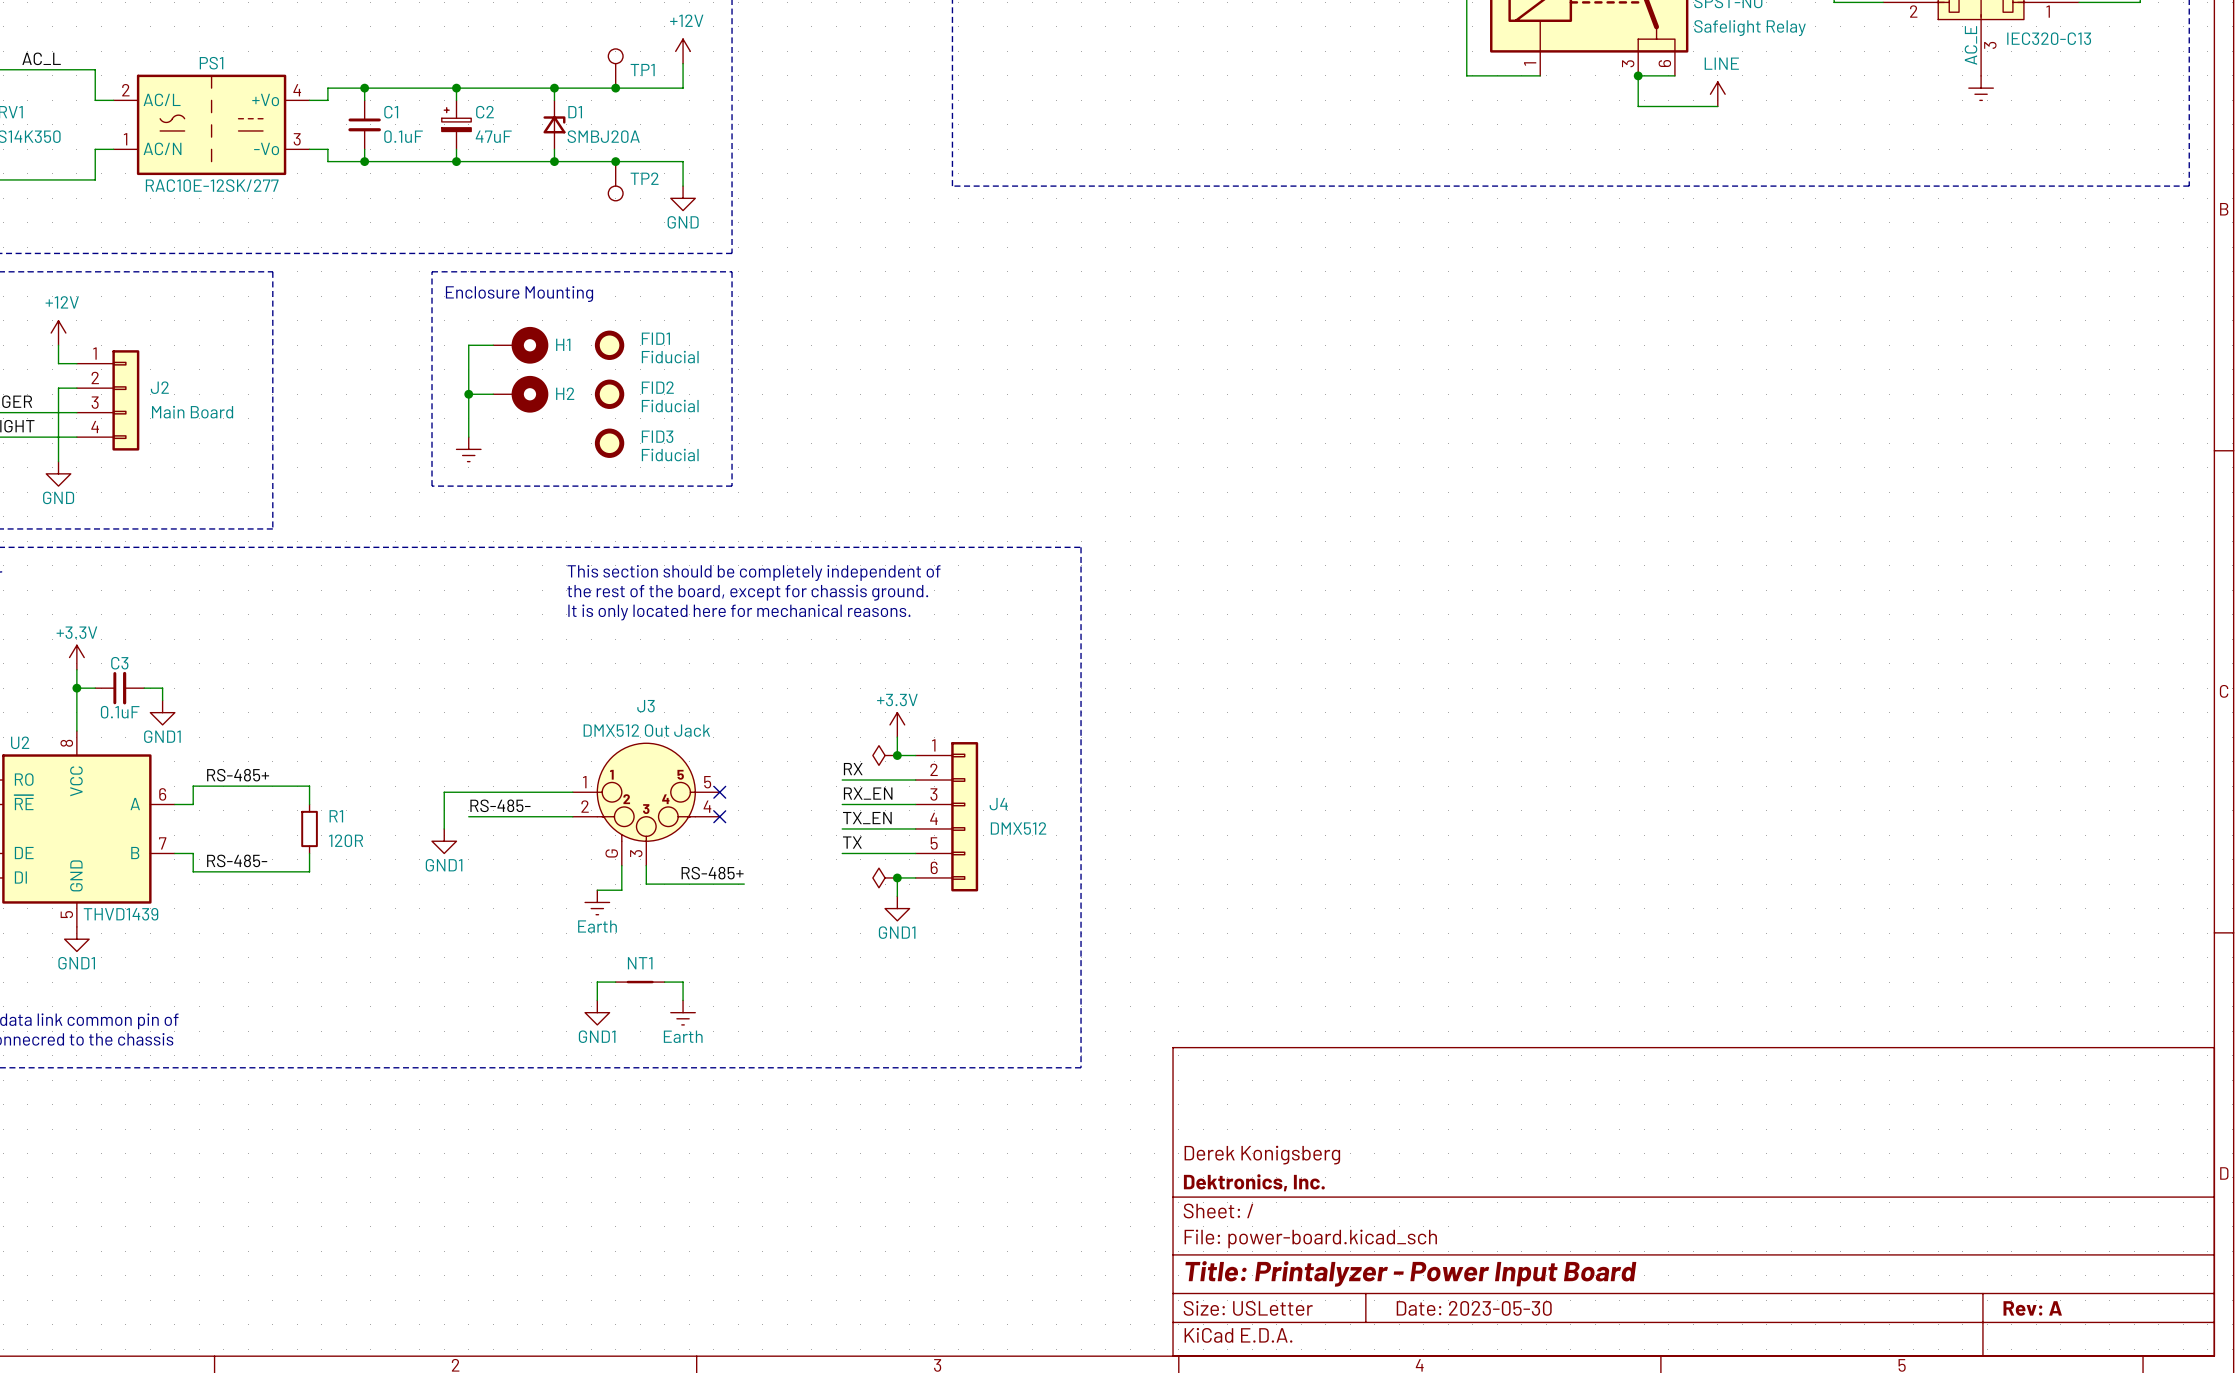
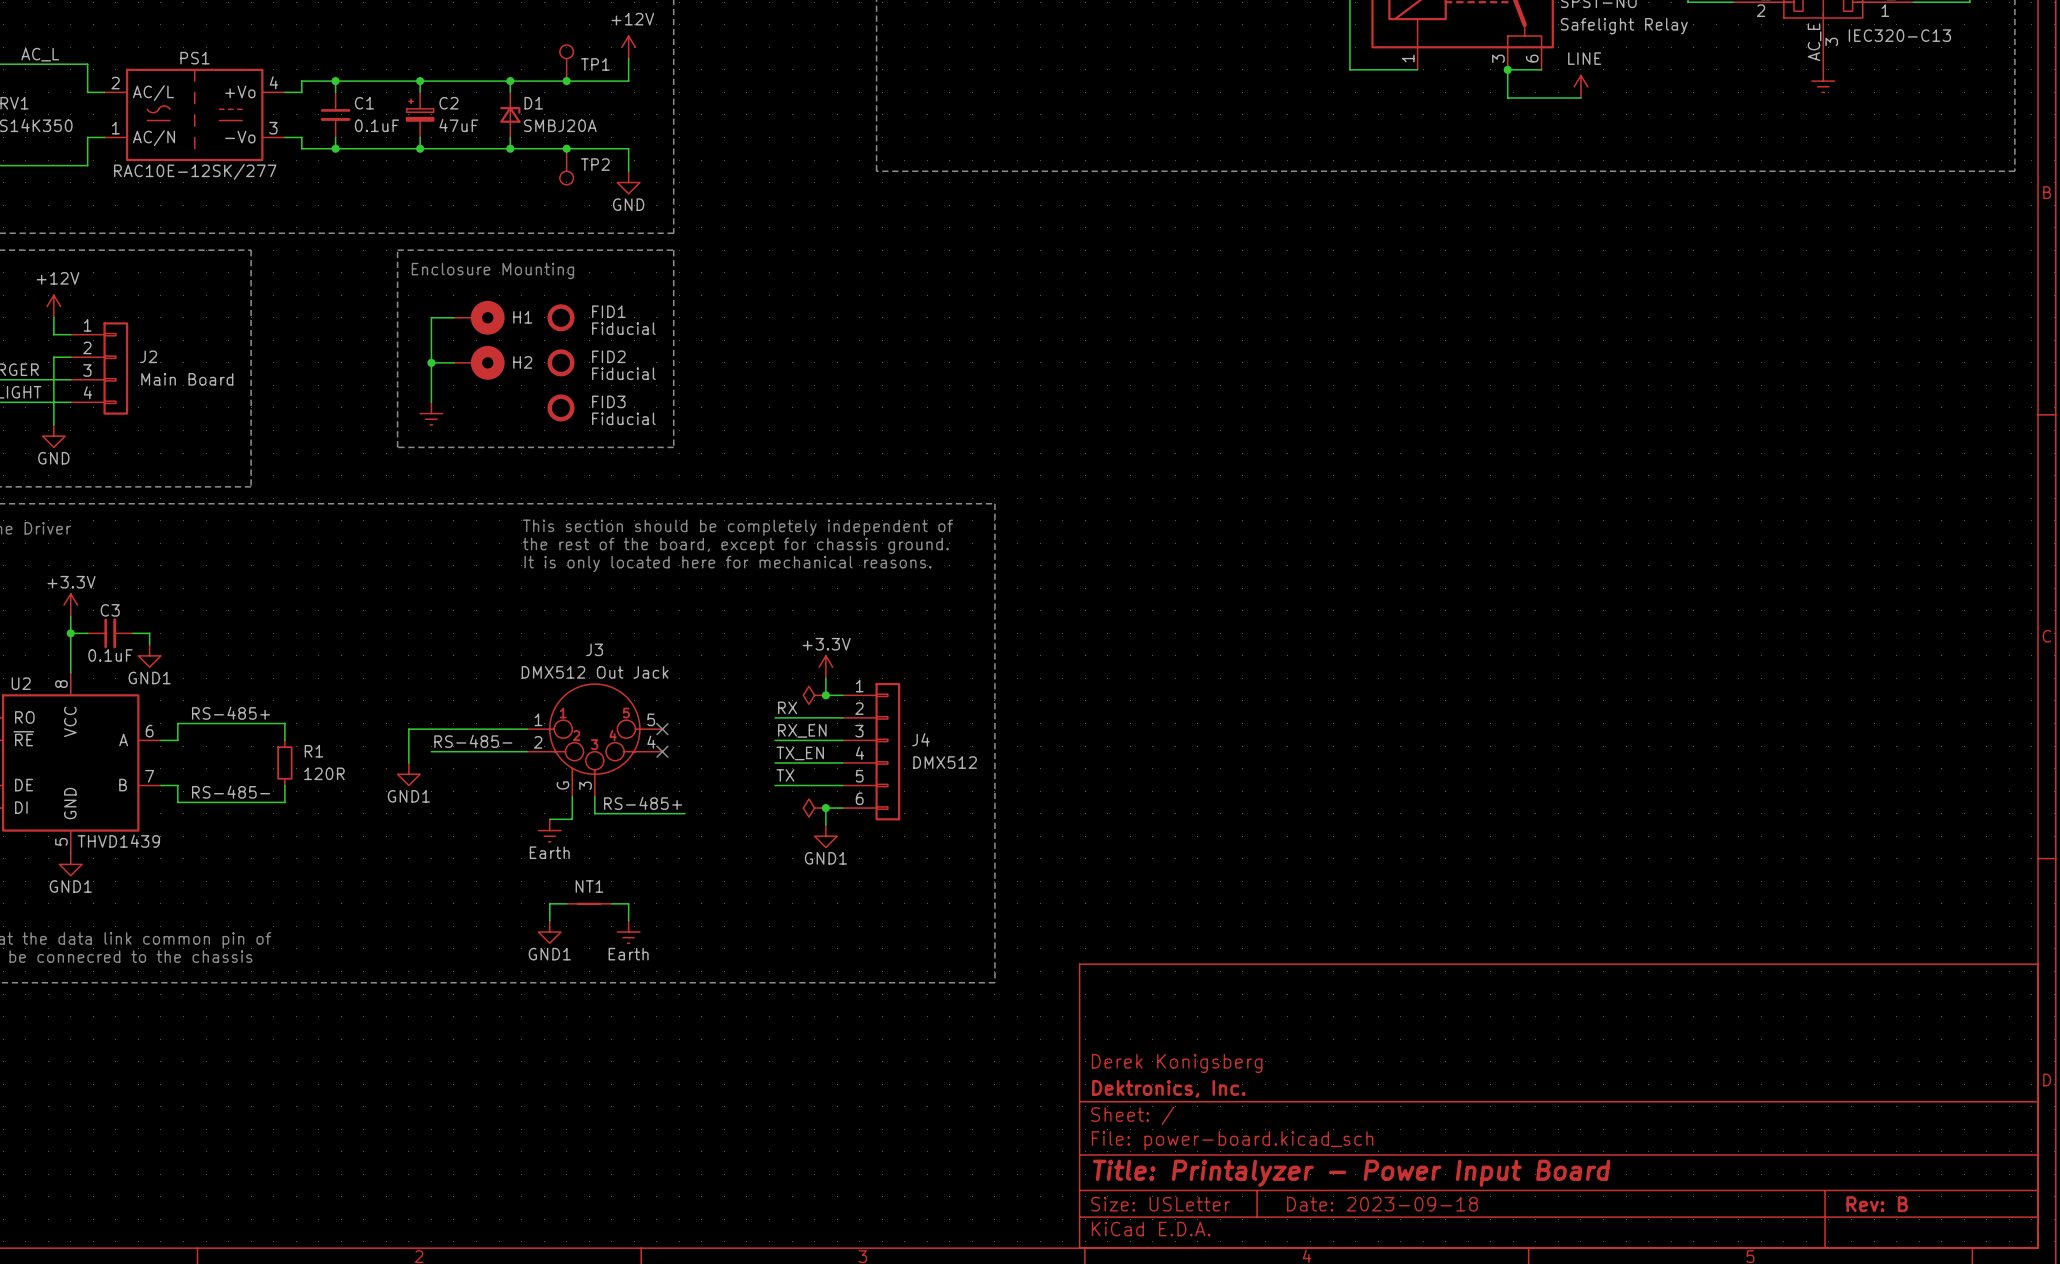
title block: Date: 2023-05-30 (1474, 1308) -> Date: 2023-09-18 (1382, 1204)
title block: Rev: A (2032, 1308) -> Rev: B (1877, 1204)

